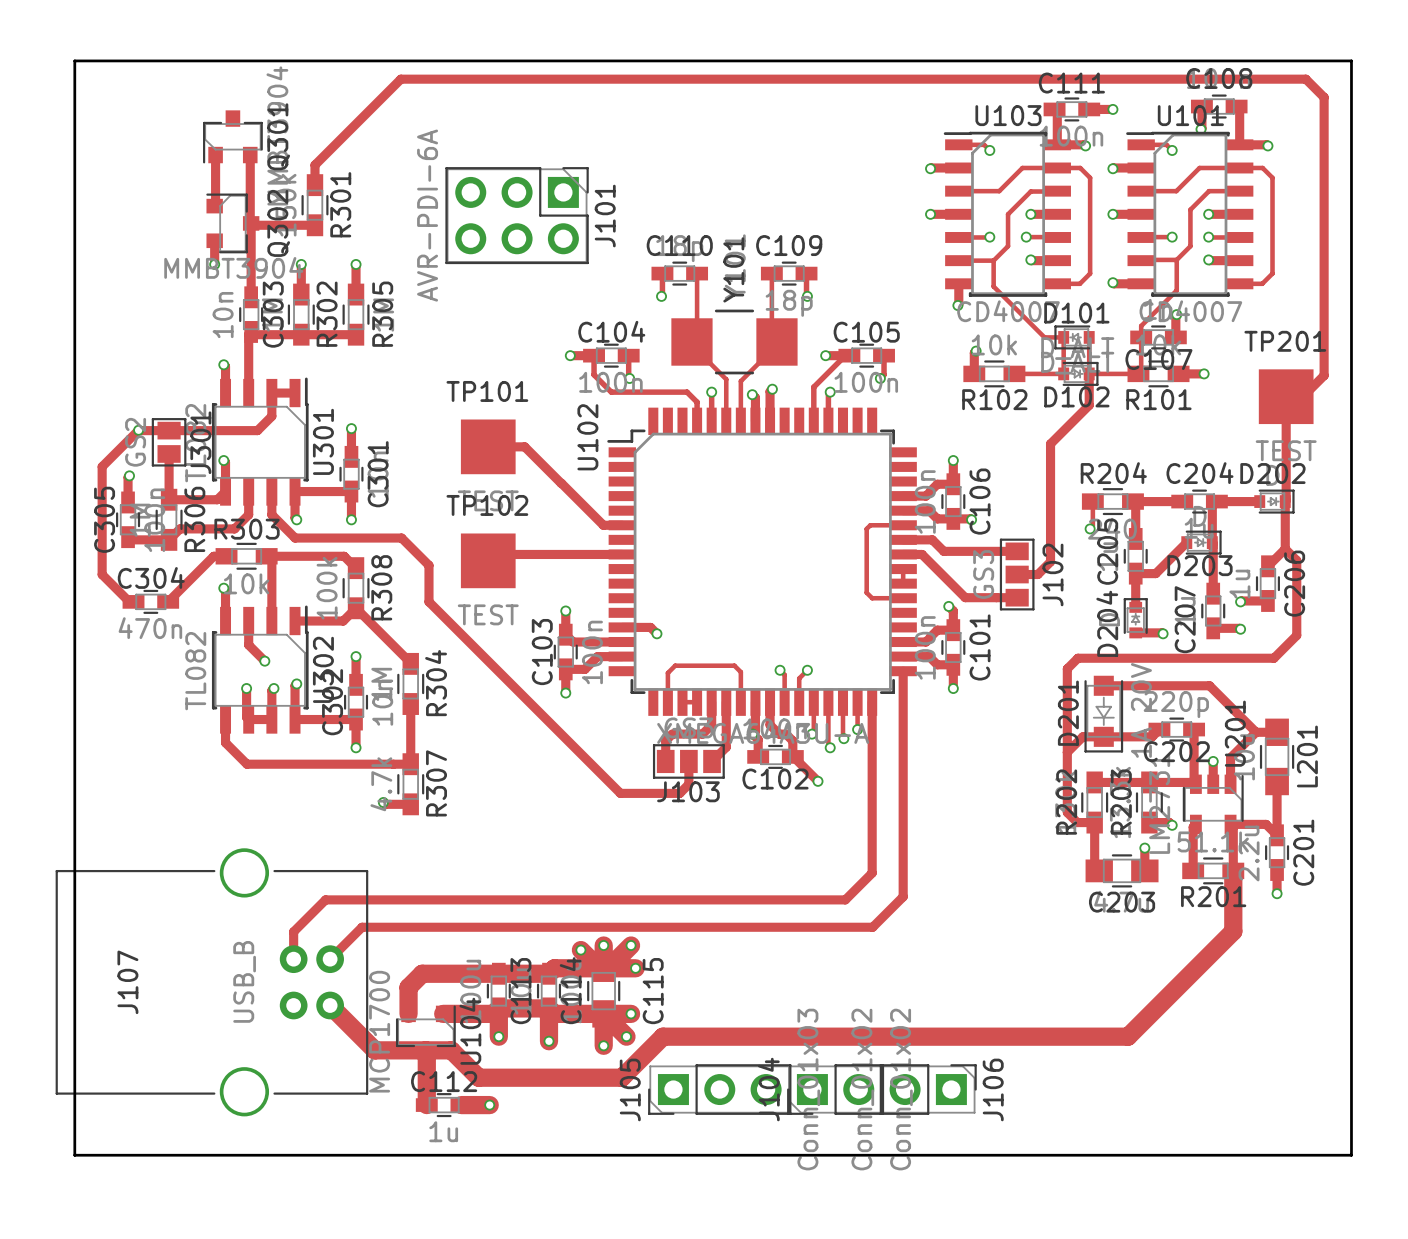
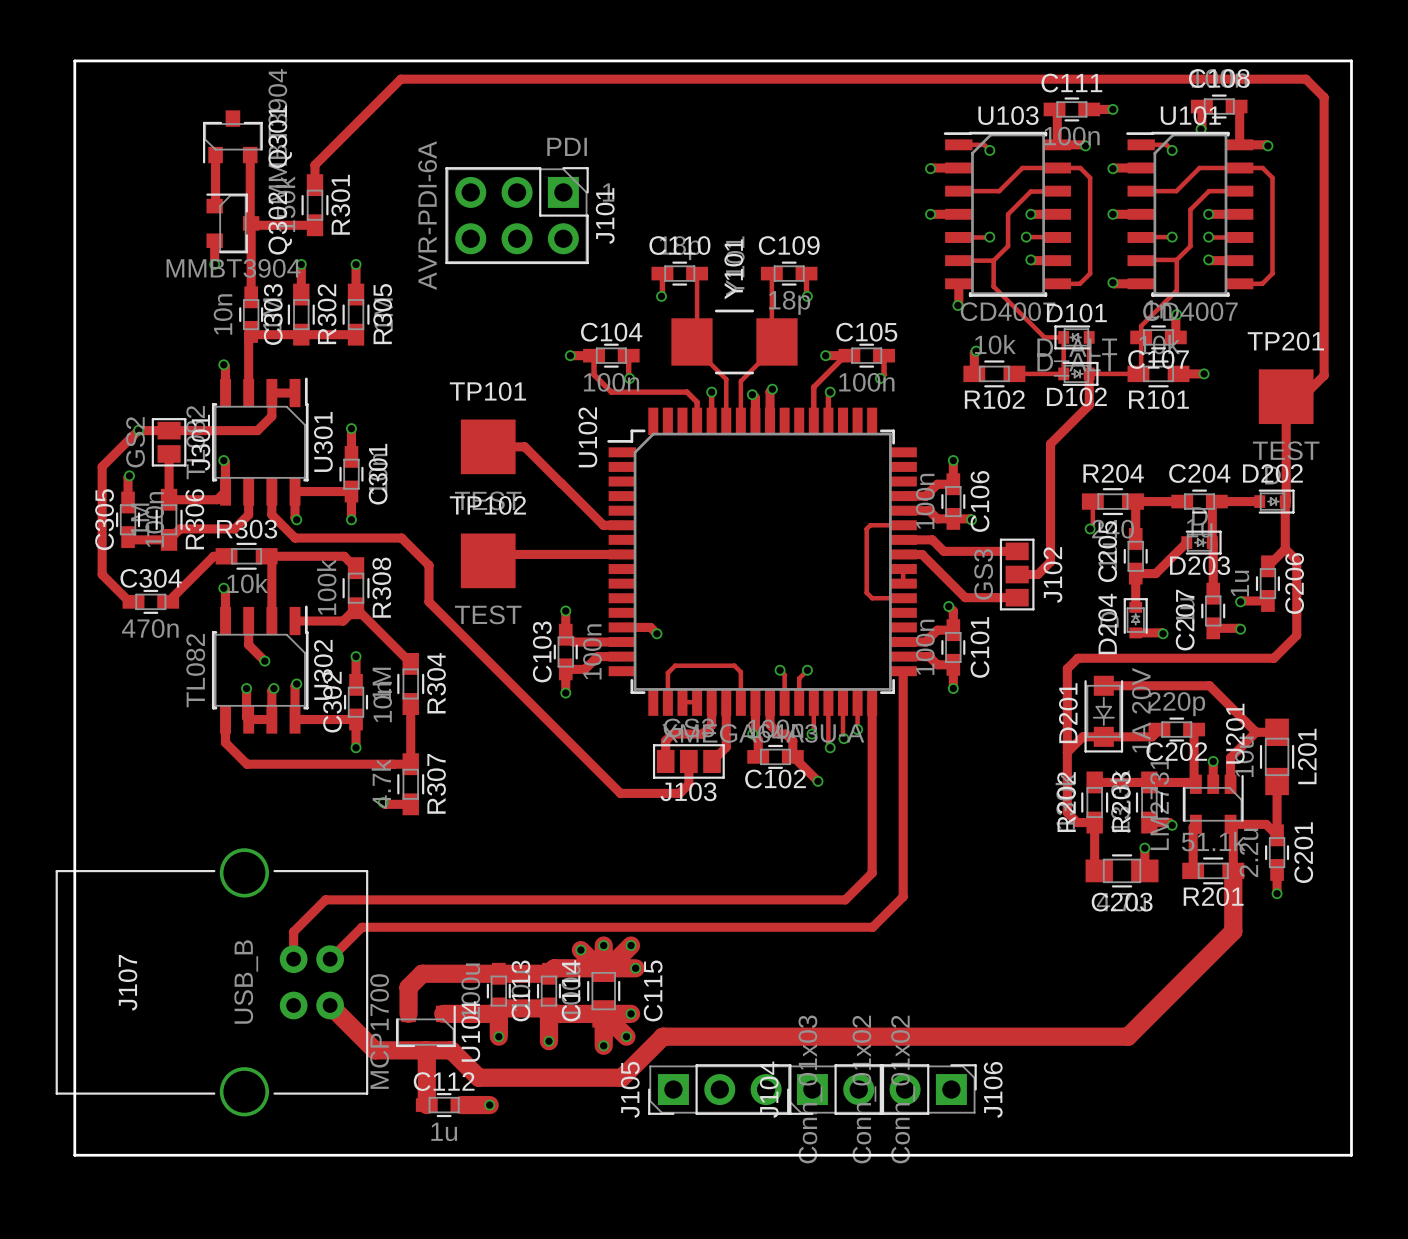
text: none -> PDI (567, 146)
text: none -> 1 (608, 192)

